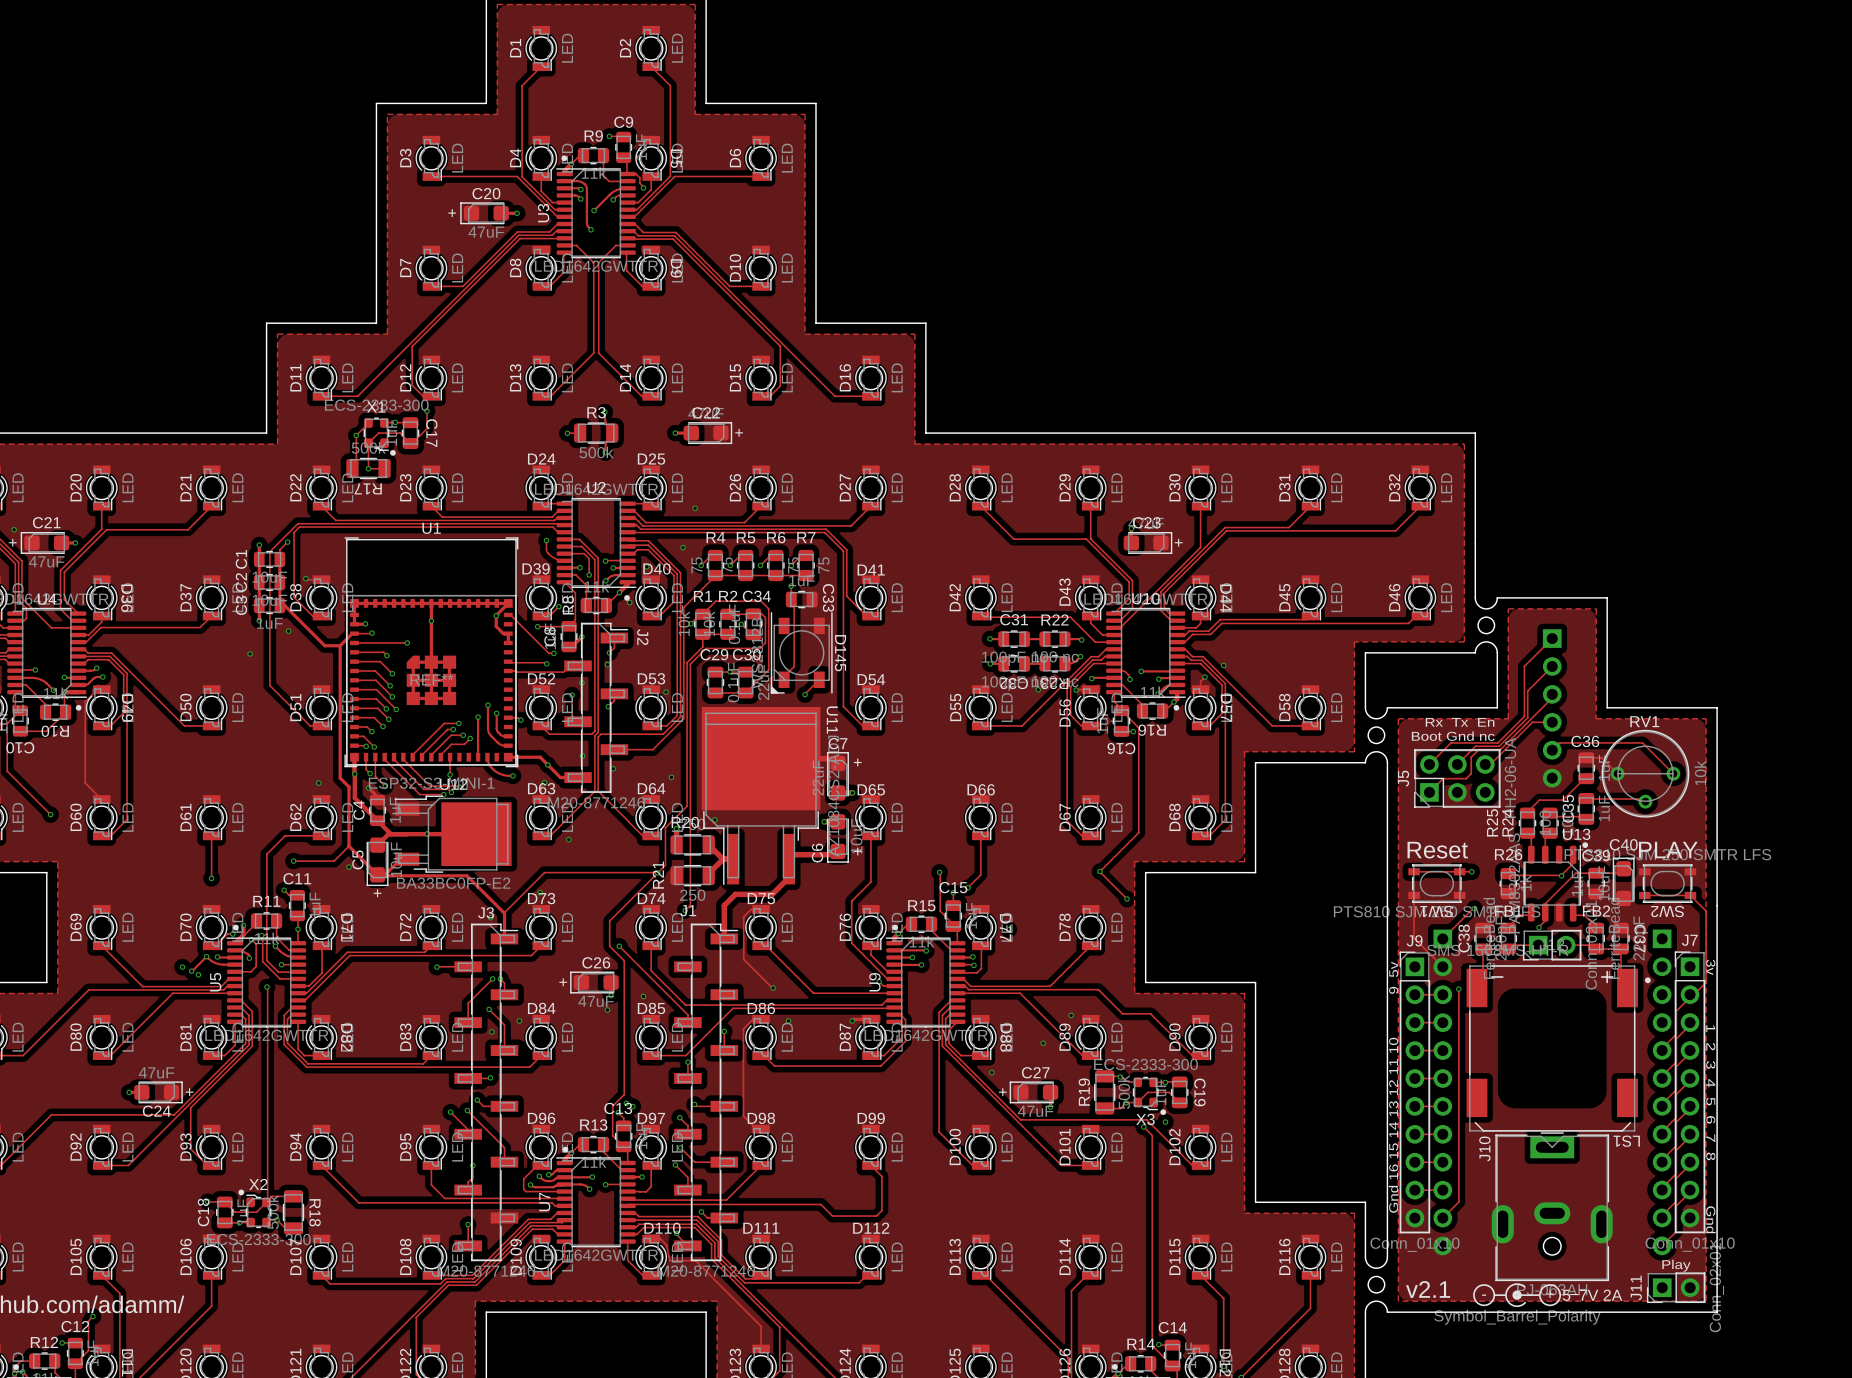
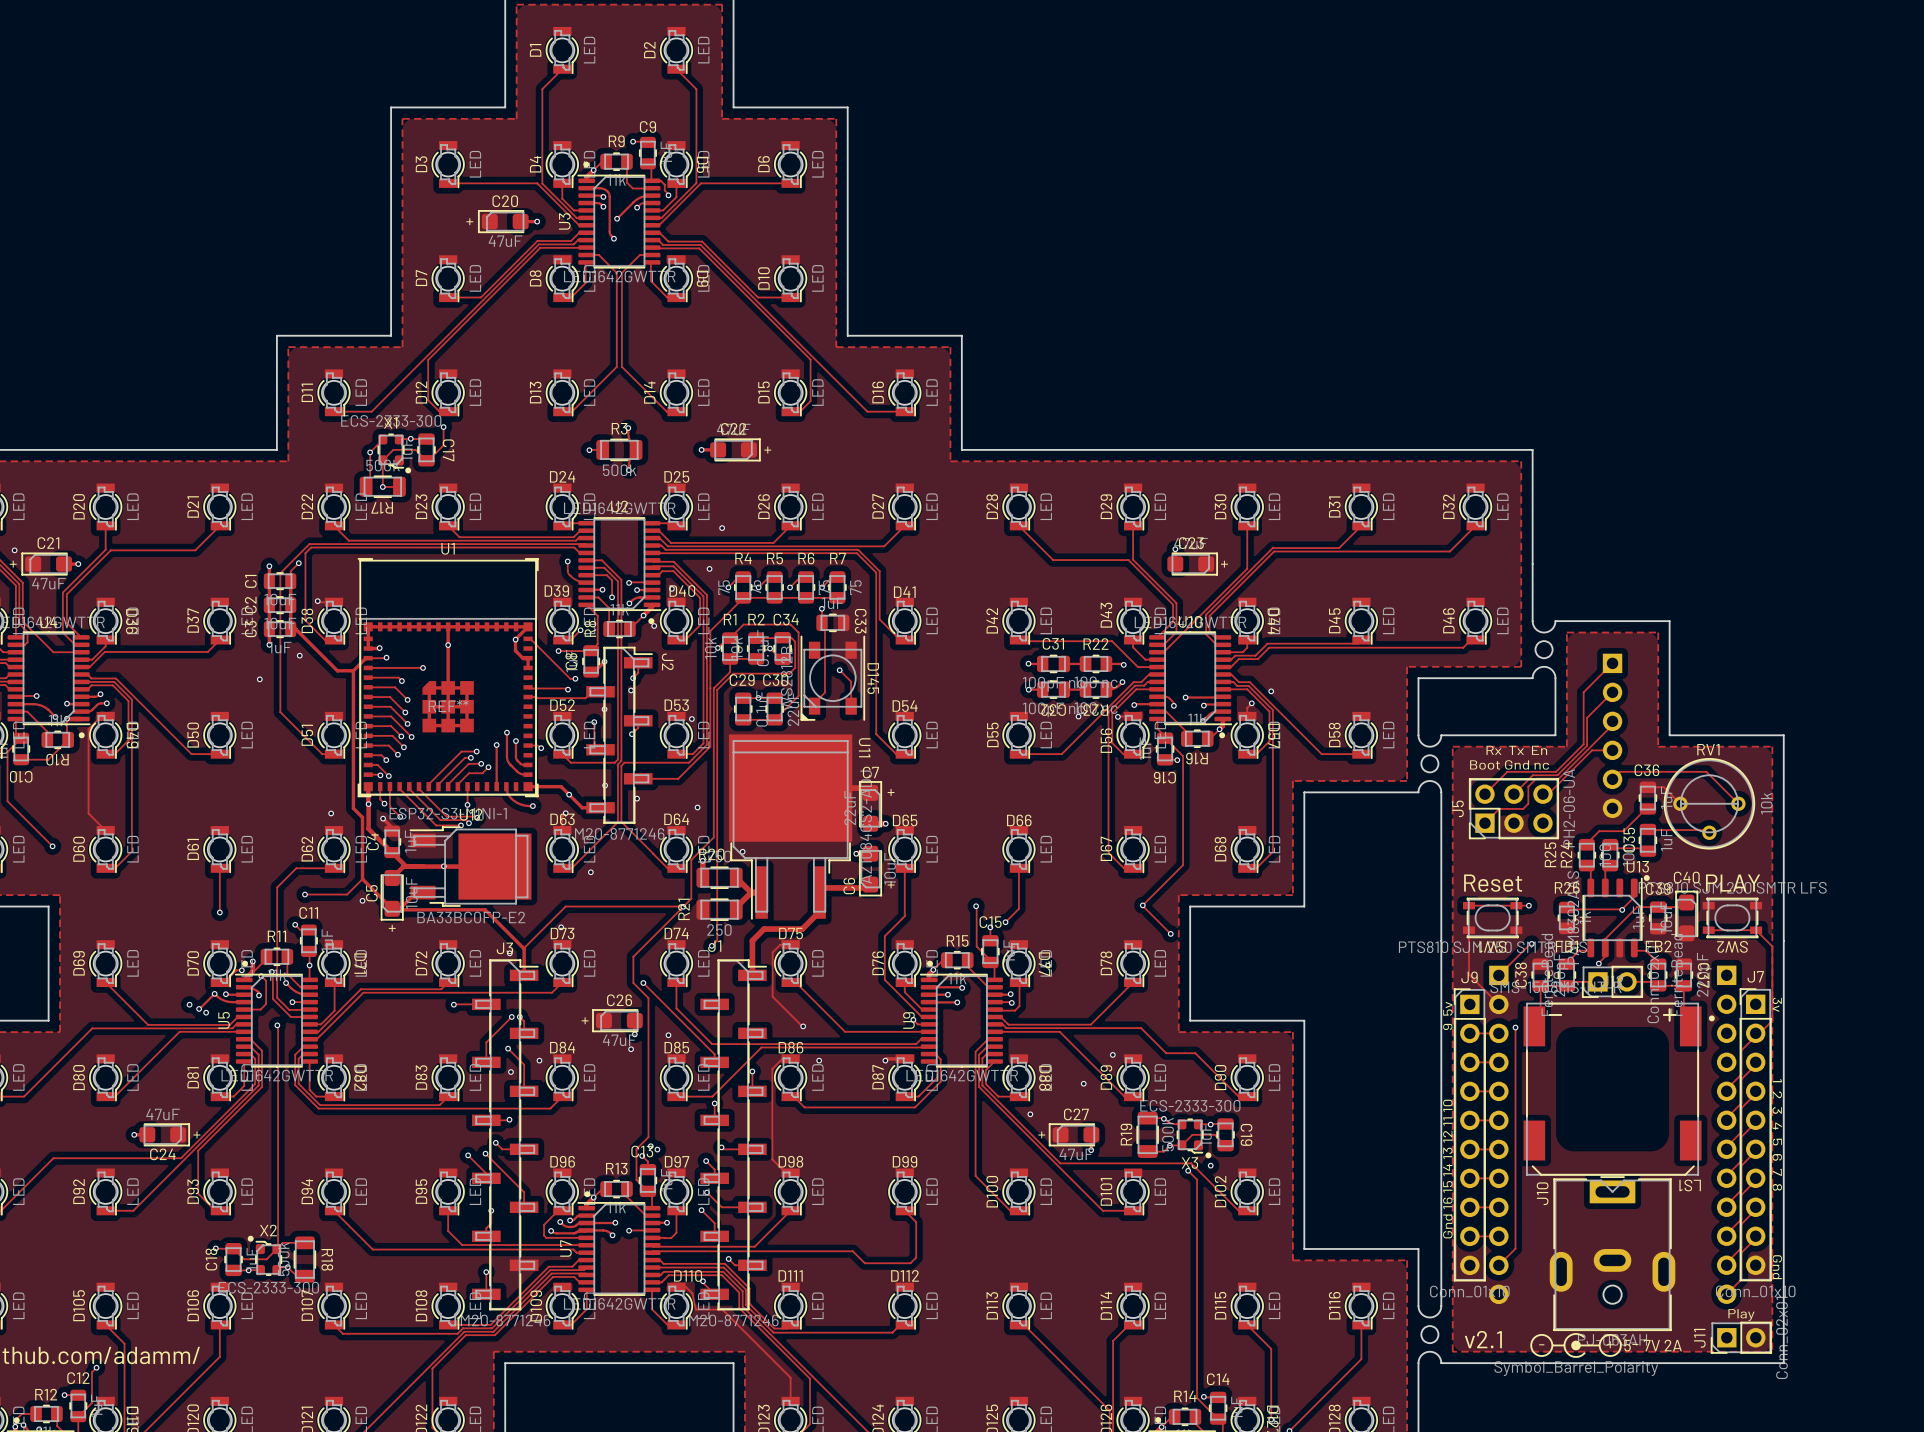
track: (819, 679) (805, 694) -> (851, 706) (851, 681) (839, 670)
via position: (805, 694) -> (839, 670)

